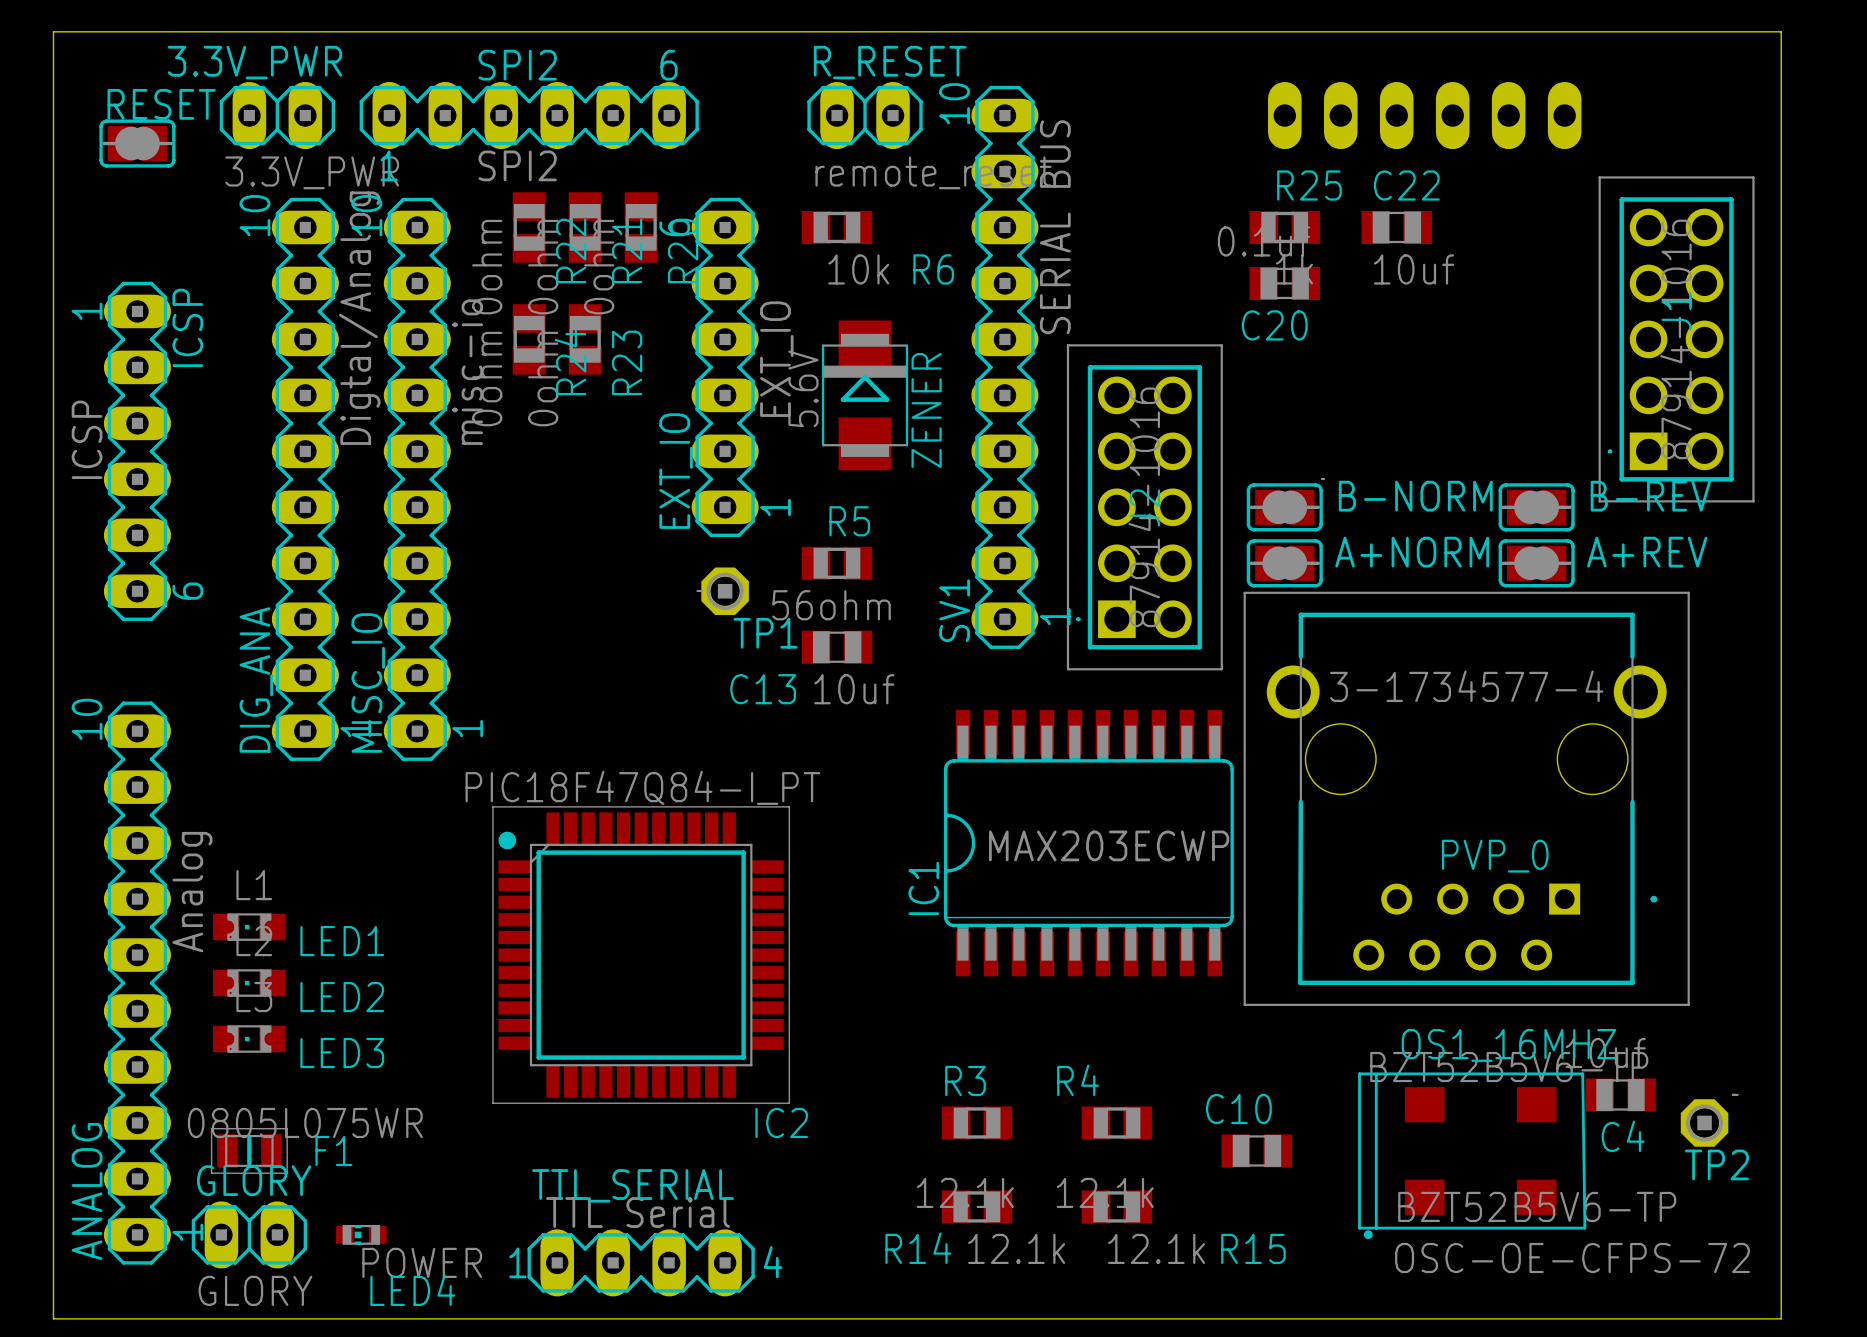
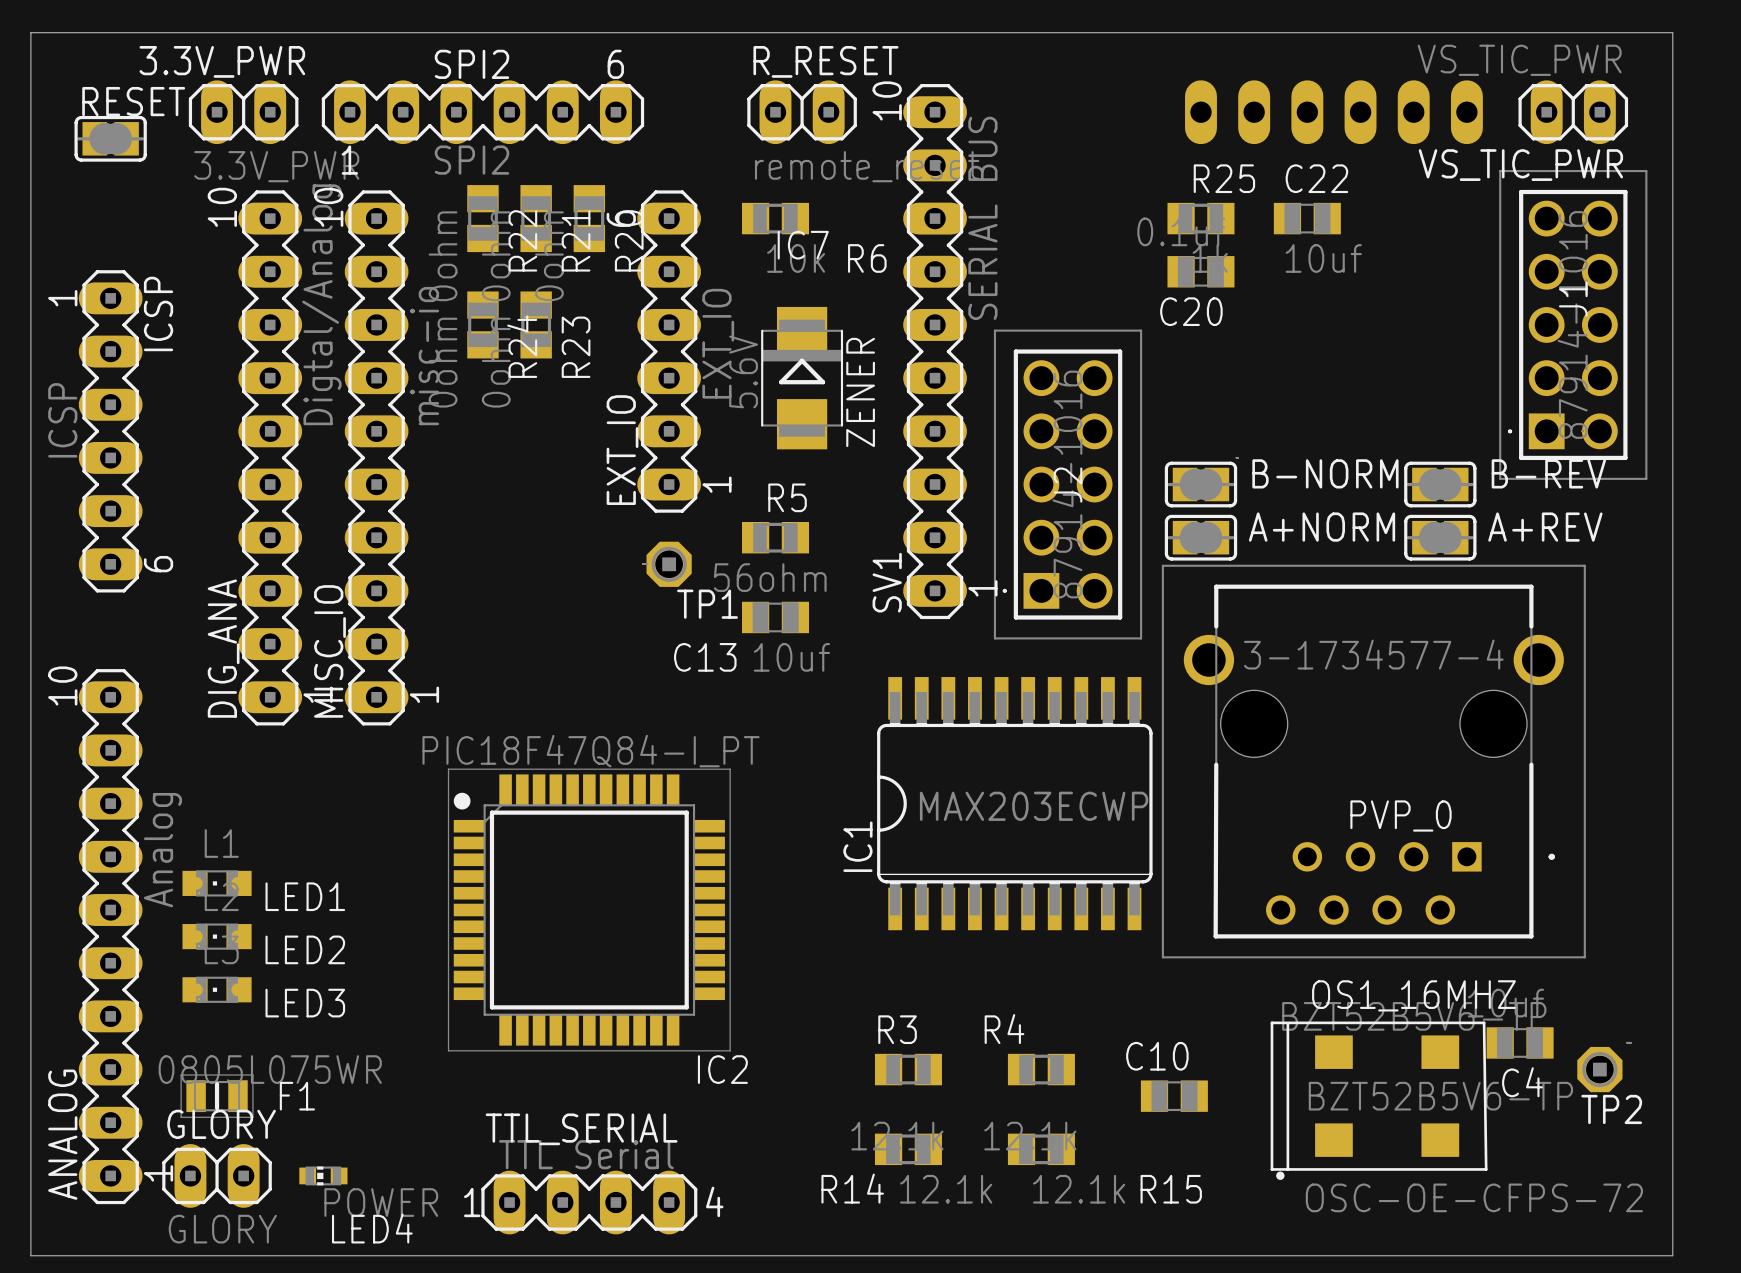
VS_TIC_PWR: none -> VS_TIC_PWR (1573, 112)
IC7: none -> (803, 245)
part position: (1537, 1206) -> (1440, 1096)

